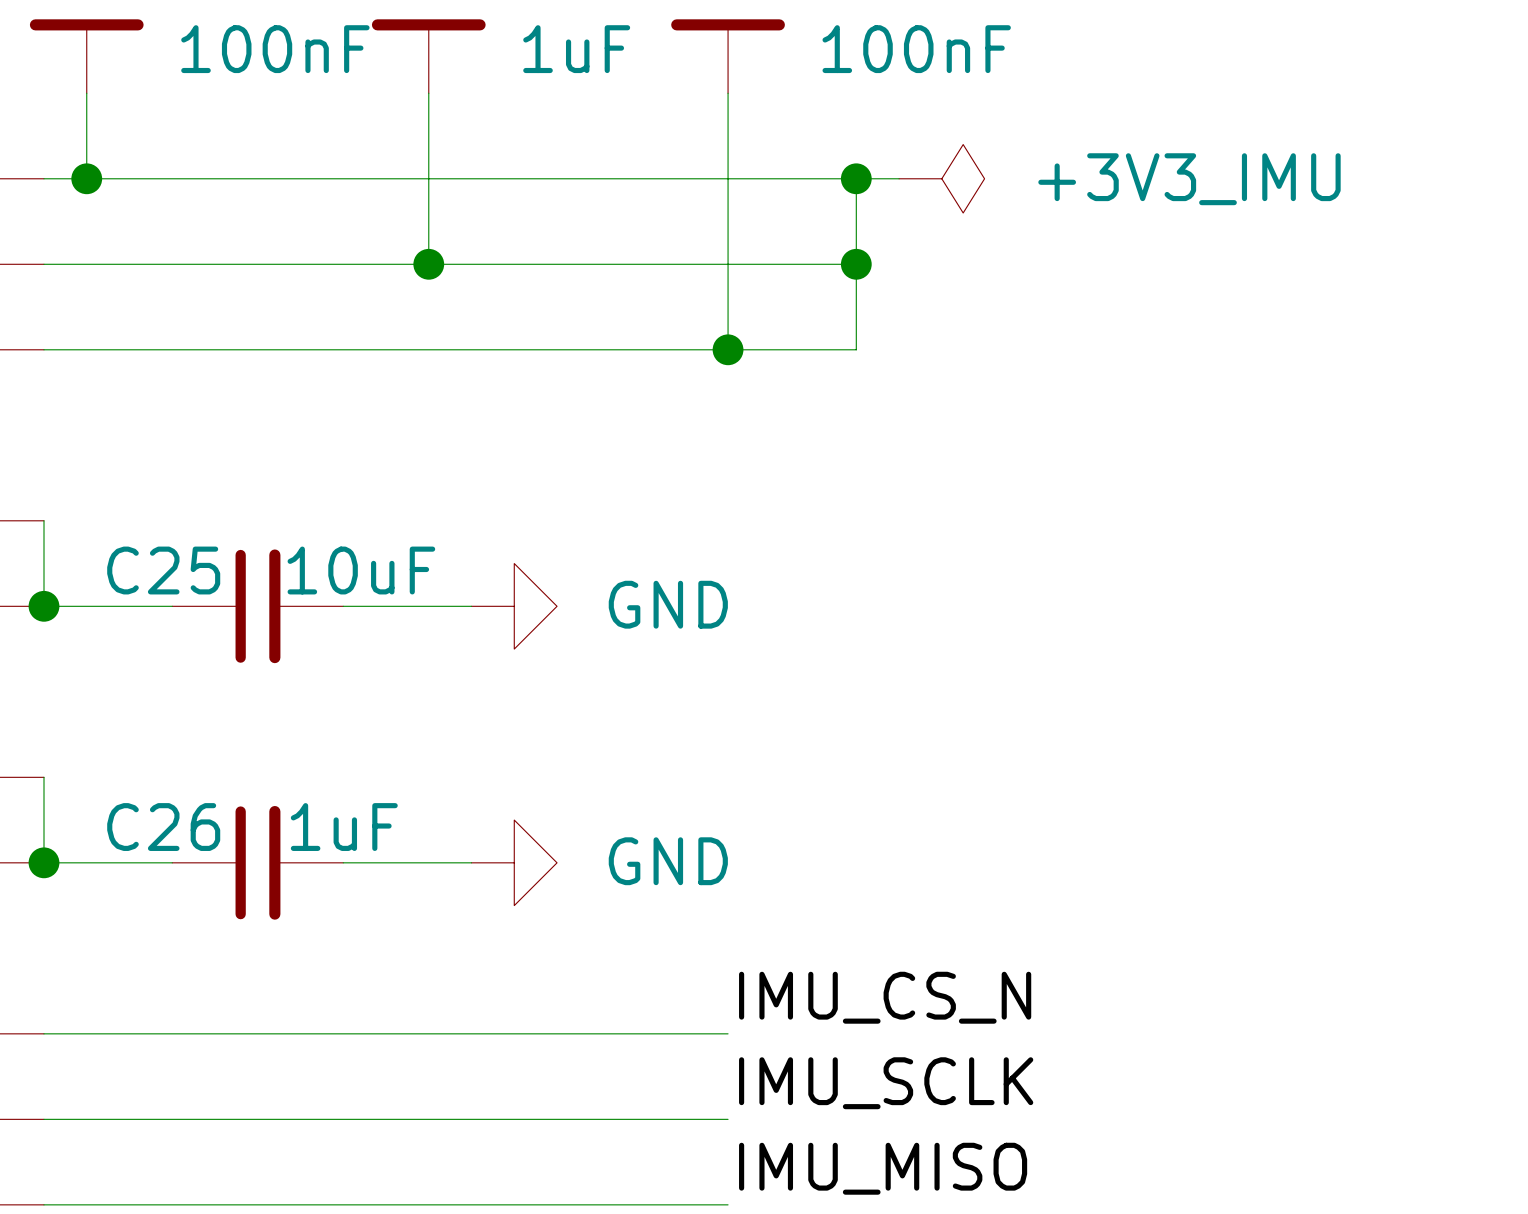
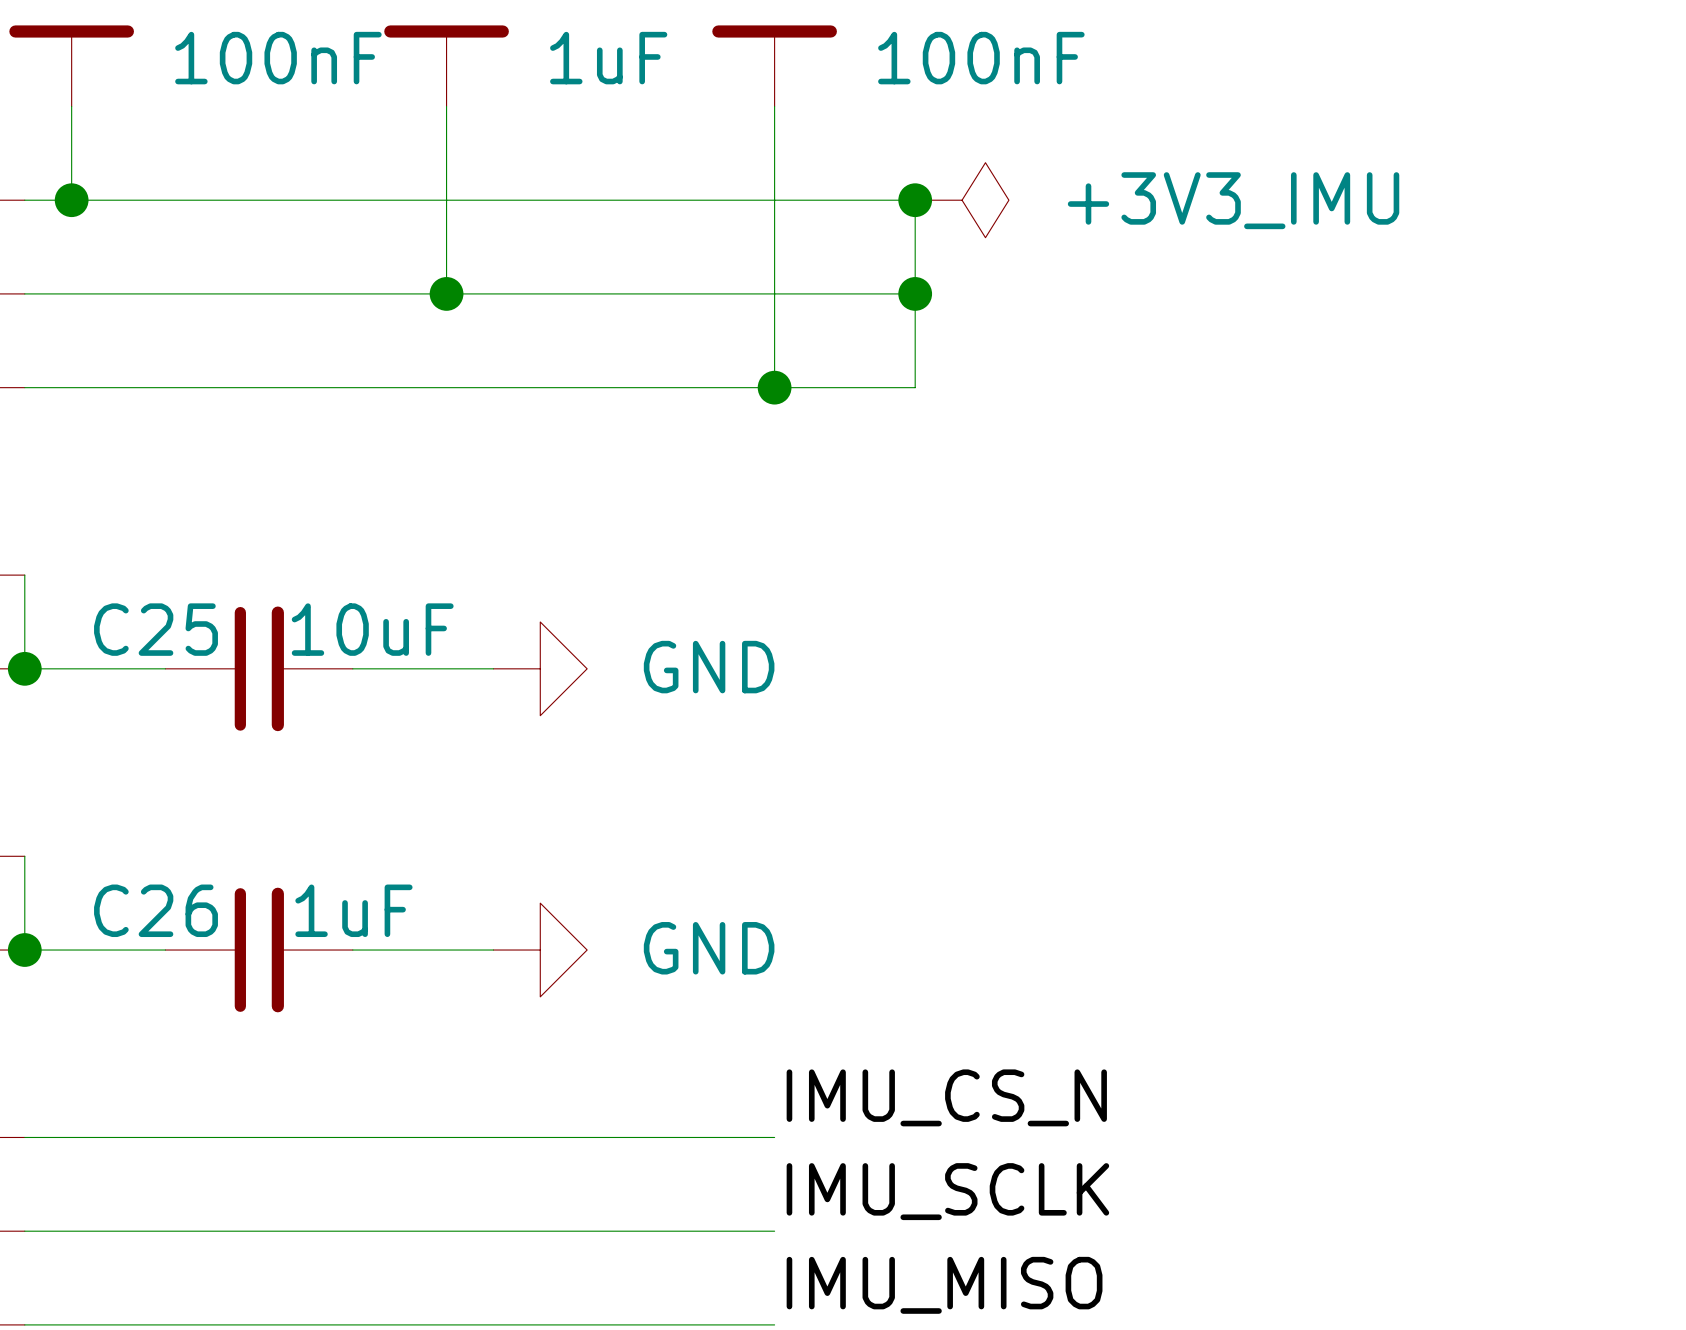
power symbol position: +3V3_IMU (941, 178) -> +3V3_IMU (962, 200)

